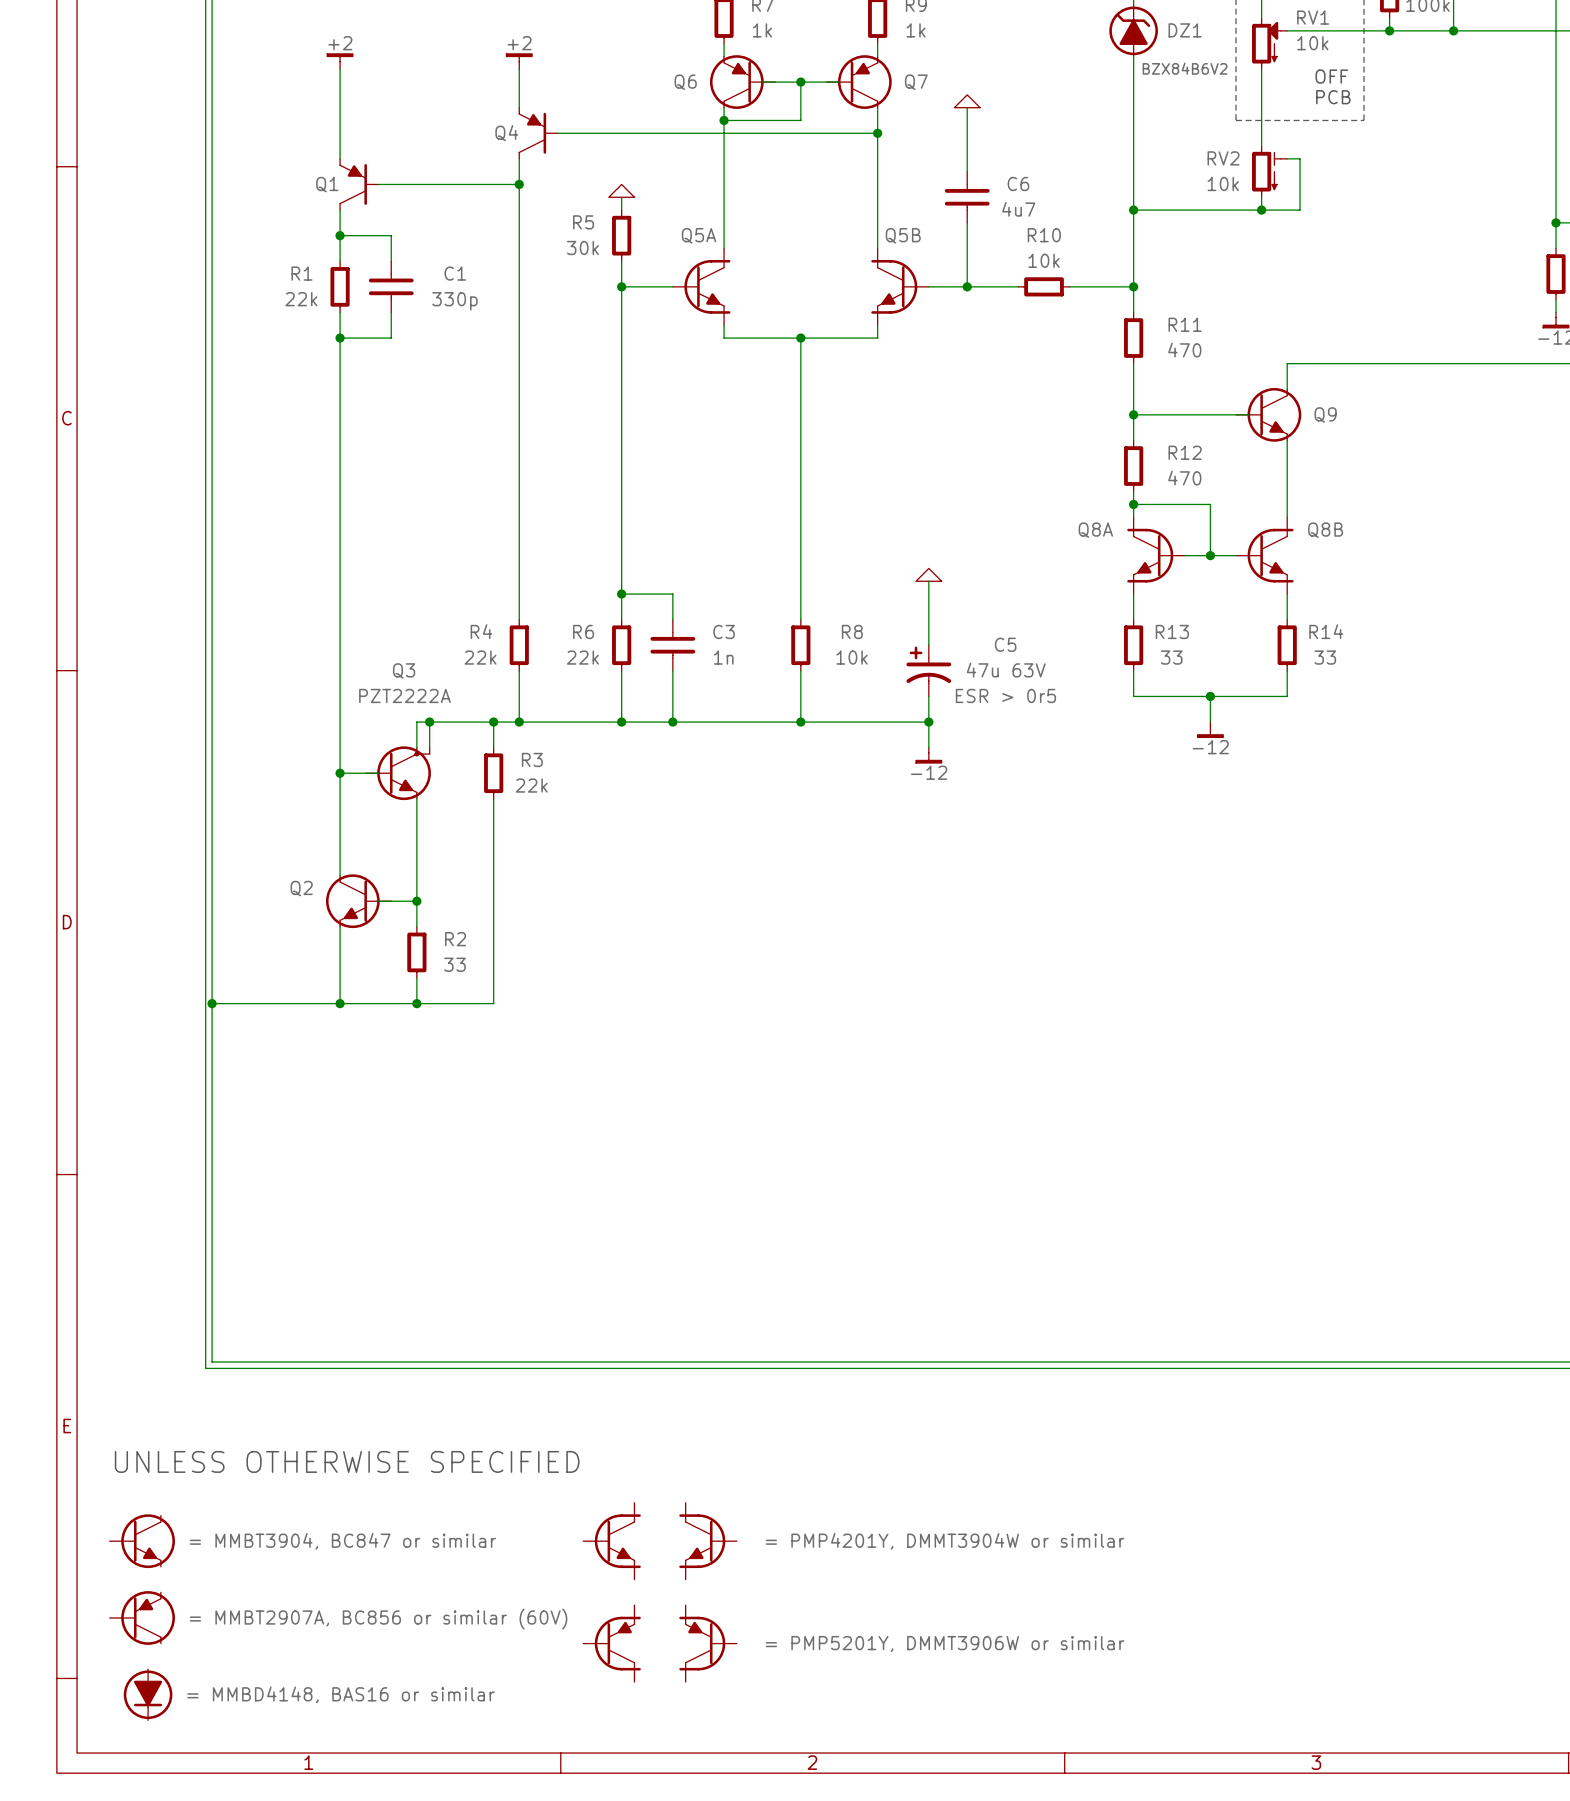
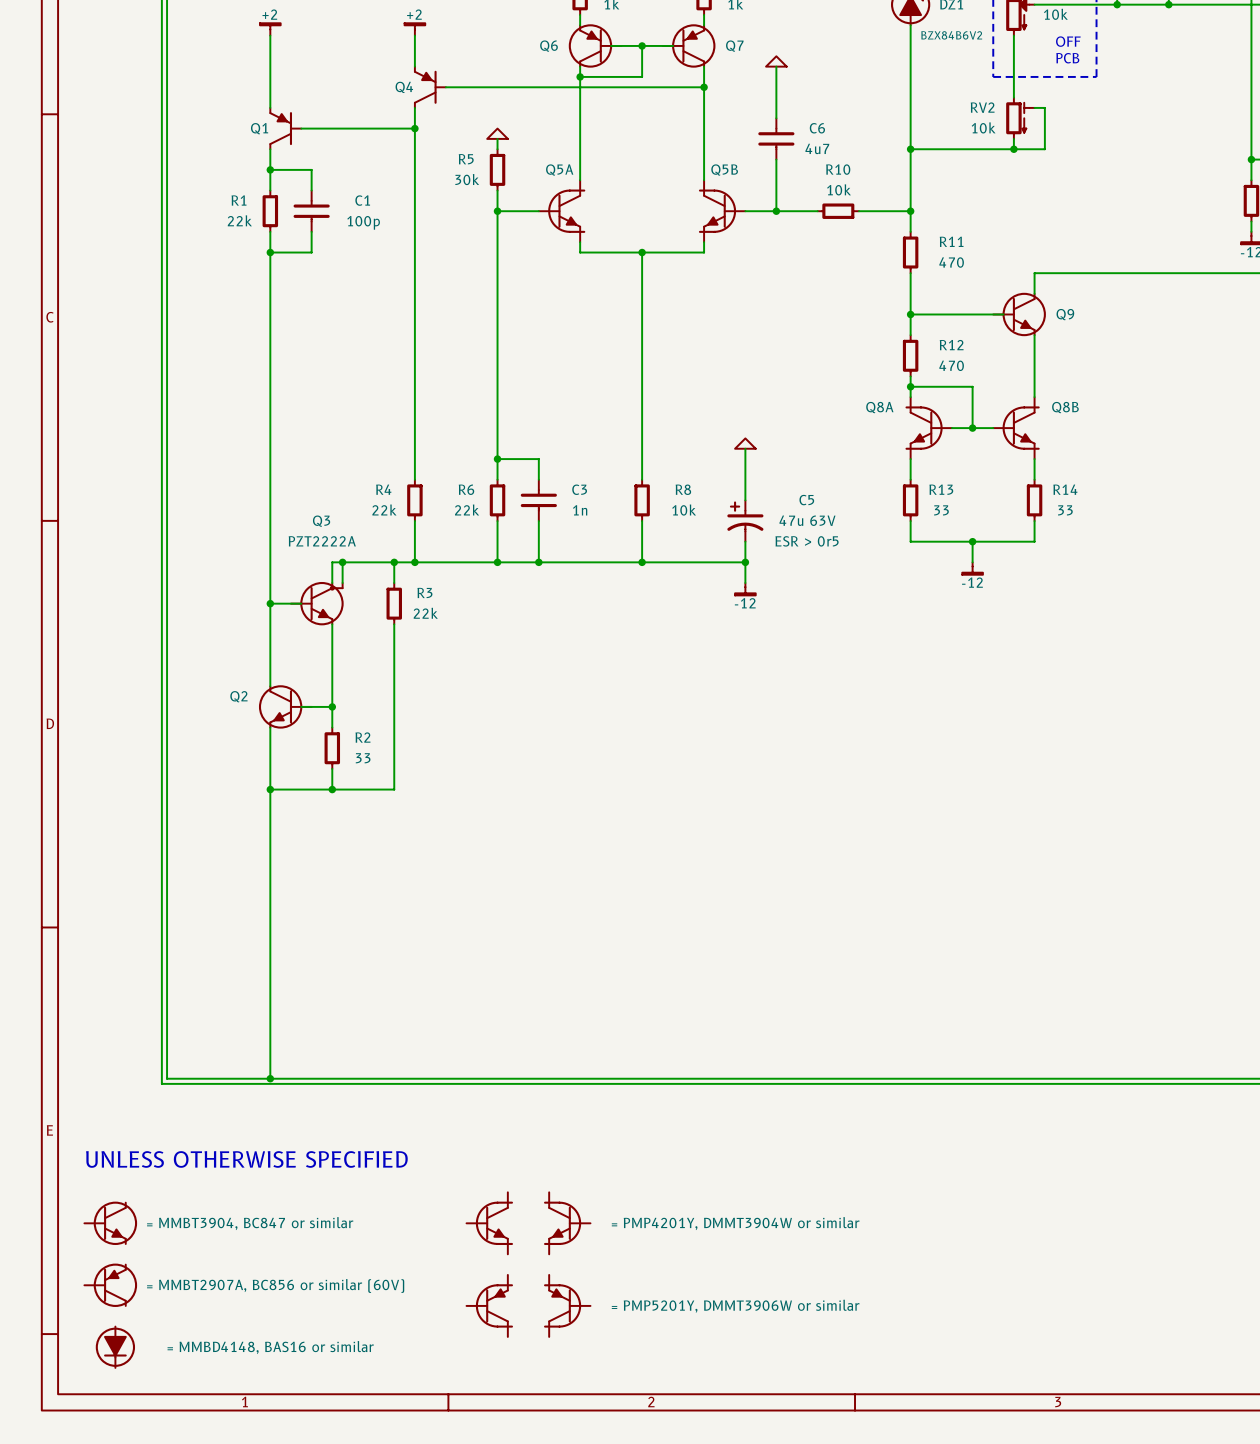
C1 value: 330p (454, 301) -> 100p (363, 222)
wire: (212, 1003) (340, 1003) -> (270, 1078) (270, 789)
junction: (212, 1003) -> none
junction: none -> (270, 1078)

